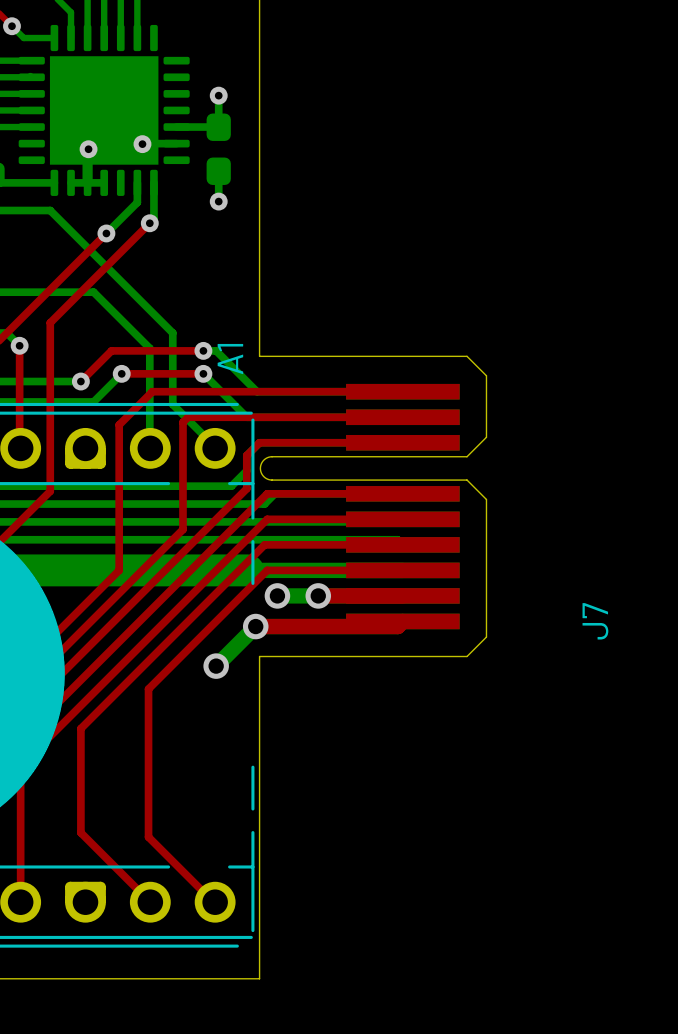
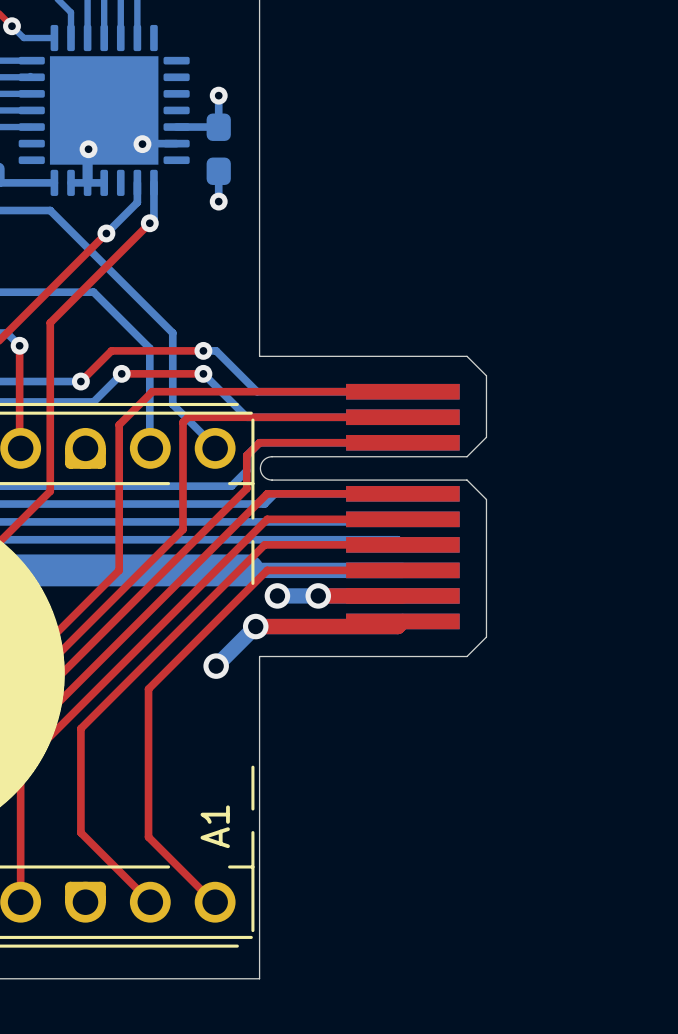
A1 name position: A1 (230, 359) -> A1 (215, 826)
J7 name: J7 (595, 621) -> none

